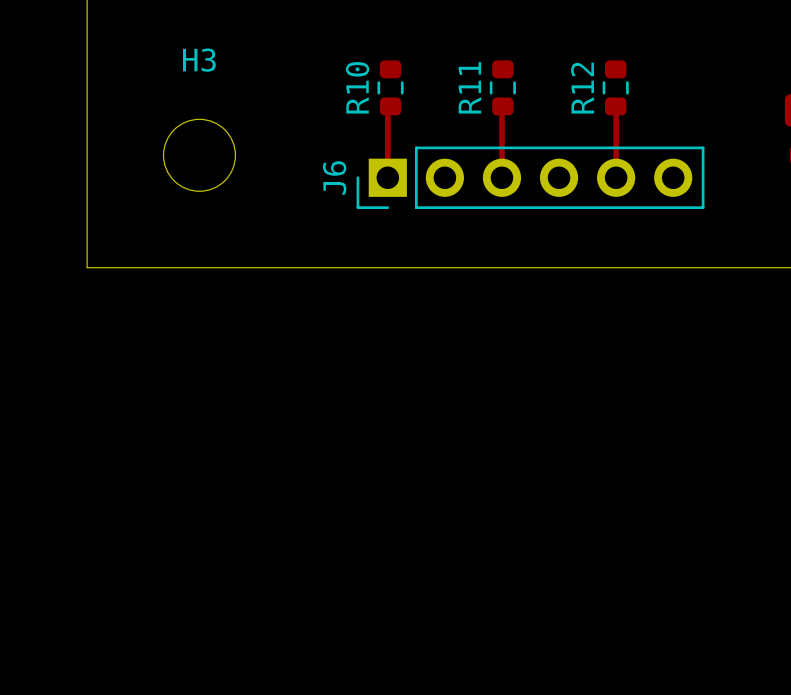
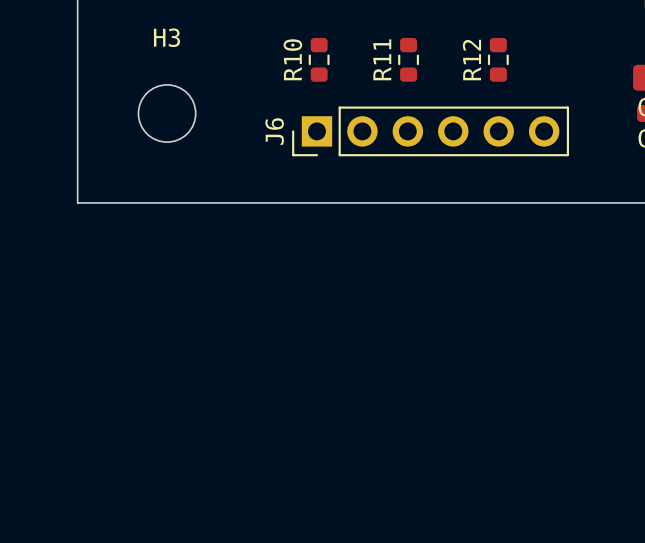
top track: (390, 106) (387, 109) (387, 177) -> none
top track: (502, 106) (501, 177) -> none
top track: (615, 106) (616, 177) -> none

